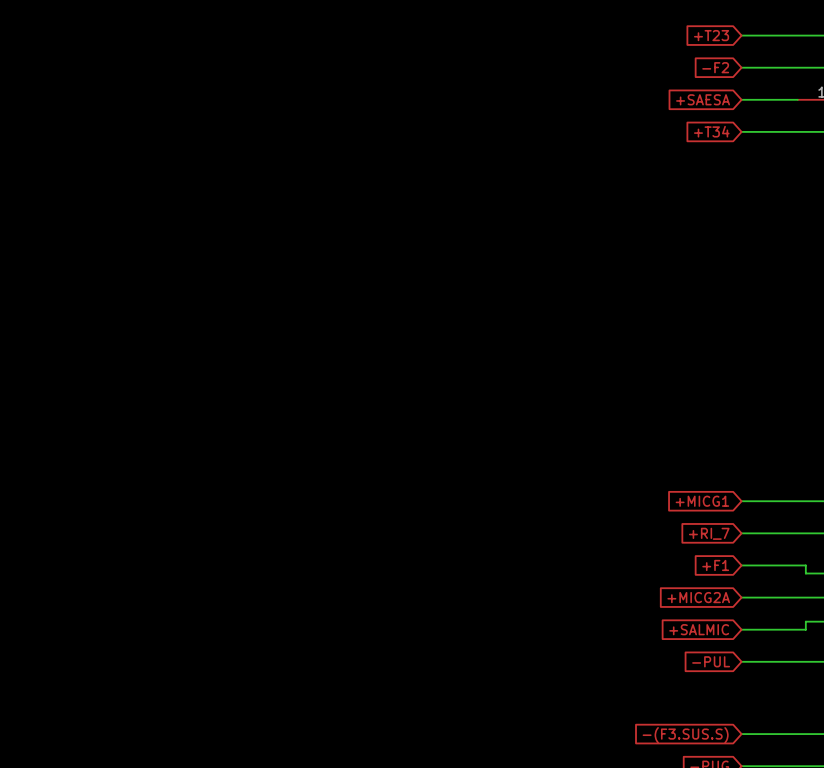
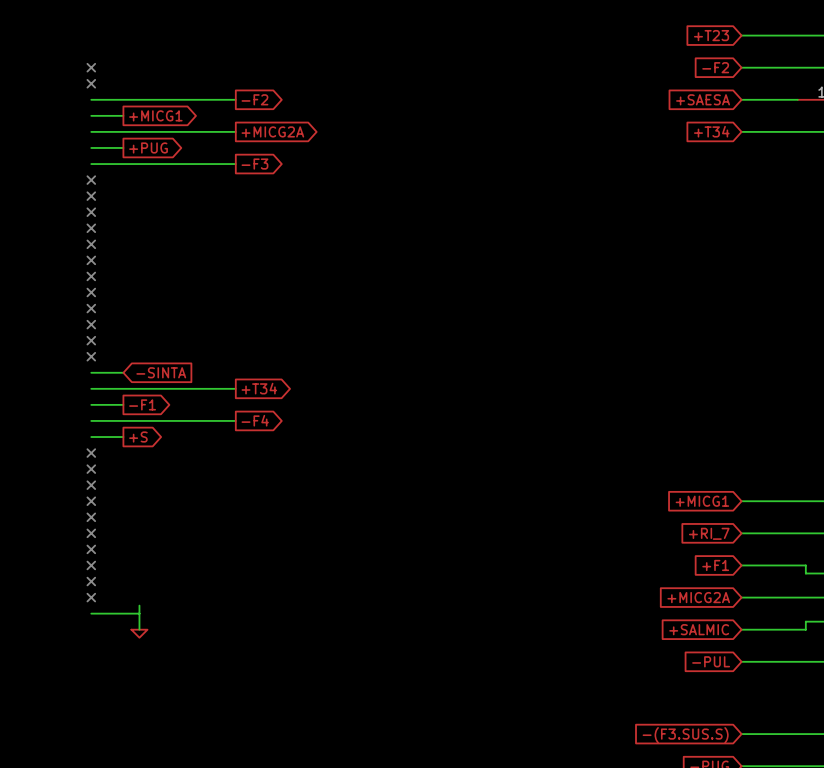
no-connect mark: none -> (91, 67)
no-connect mark: none -> (91, 83)
wire: none -> (91, 99) (235, 99)
global label: none -> -F2 (254, 99)
wire: none -> (91, 115) (123, 115)
global label: none -> +MICG1 (155, 115)
wire: none -> (91, 131) (235, 131)
global label: none -> +MICG2A (272, 131)
wire: none -> (91, 147) (123, 147)
global label: none -> +PUG (148, 147)
wire: none -> (91, 164) (235, 164)
global label: none -> -F3 (254, 164)
no-connect mark: none -> (91, 180)
no-connect mark: none -> (91, 196)
no-connect mark: none -> (91, 212)
no-connect mark: none -> (91, 228)
no-connect mark: none -> (91, 244)
no-connect mark: none -> (91, 260)
no-connect mark: none -> (91, 276)
no-connect mark: none -> (91, 292)
no-connect mark: none -> (91, 308)
no-connect mark: none -> (91, 324)
no-connect mark: none -> (91, 340)
no-connect mark: none -> (91, 356)
wire: none -> (91, 372) (123, 372)
global label: none -> -SINTA (161, 372)
wire: none -> (91, 388) (235, 388)
global label: none -> +T34 (259, 388)
wire: none -> (91, 404) (123, 404)
global label: none -> -F1 (142, 404)
wire: none -> (91, 420) (235, 420)
global label: none -> -F4 (255, 420)
wire: none -> (91, 437) (123, 437)
global label: none -> +S (138, 437)
no-connect mark: none -> (91, 453)
no-connect mark: none -> (91, 469)
no-connect mark: none -> (91, 485)
no-connect mark: none -> (91, 501)
no-connect mark: none -> (91, 517)
no-connect mark: none -> (91, 533)
no-connect mark: none -> (91, 549)
no-connect mark: none -> (91, 565)
no-connect mark: none -> (91, 581)
no-connect mark: none -> (91, 597)
wire: none -> (139, 605) (139, 629)
wire: none -> (91, 613) (139, 613)
power symbol: none -> (139, 633)

